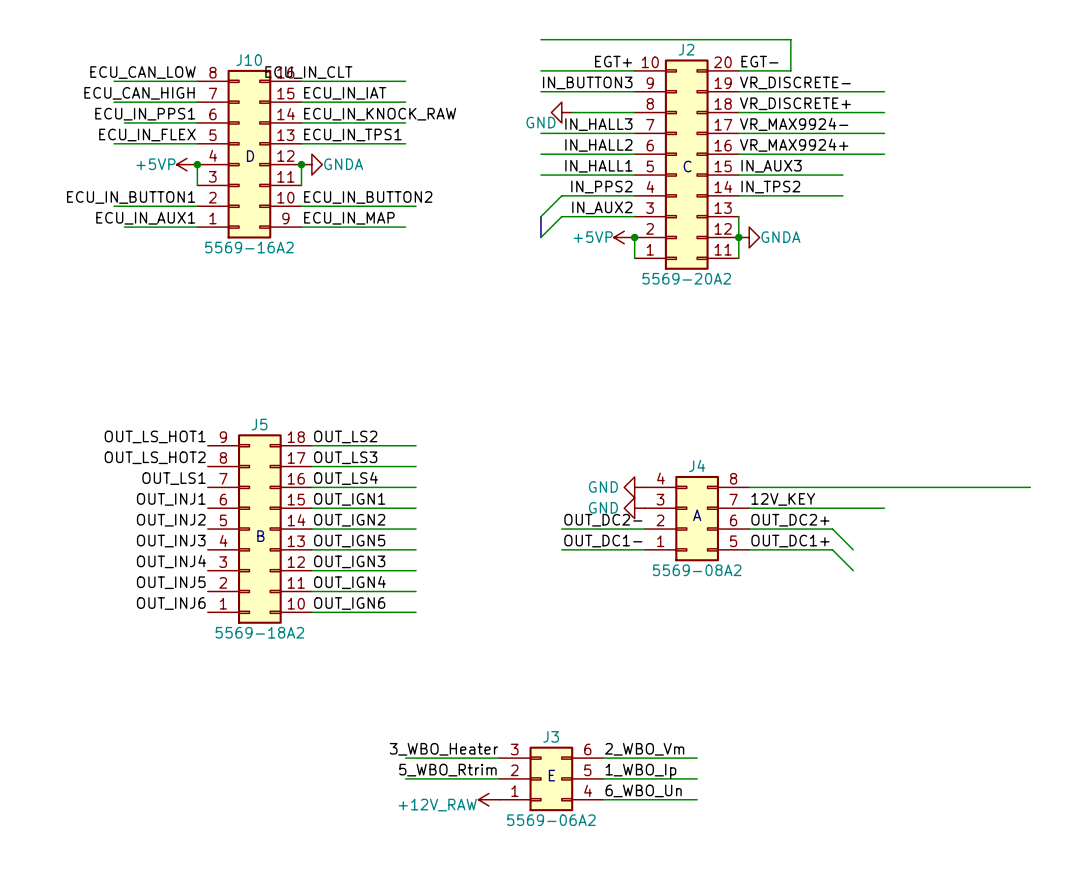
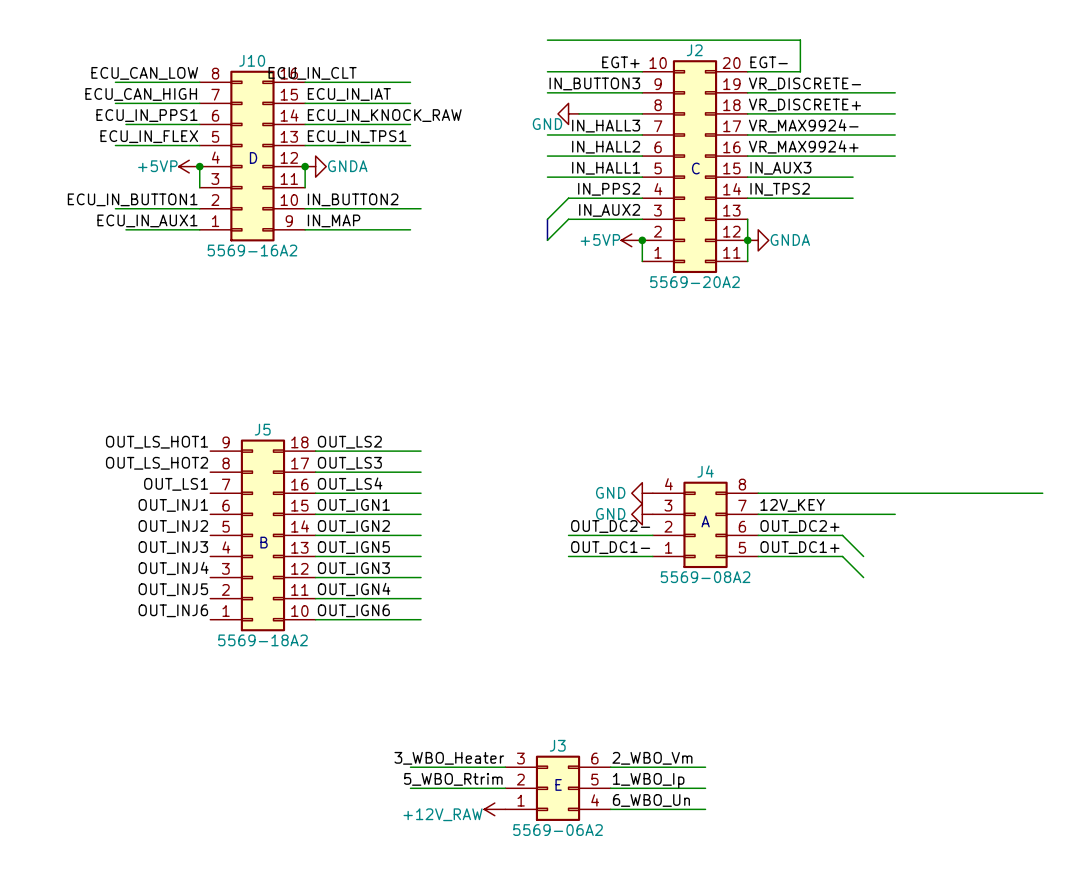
label: ECU_IN_BUTTON2 (368, 197) -> IN_BUTTON2 (353, 199)
label: ECU_IN_MAP (349, 218) -> IN_MAP (334, 220)

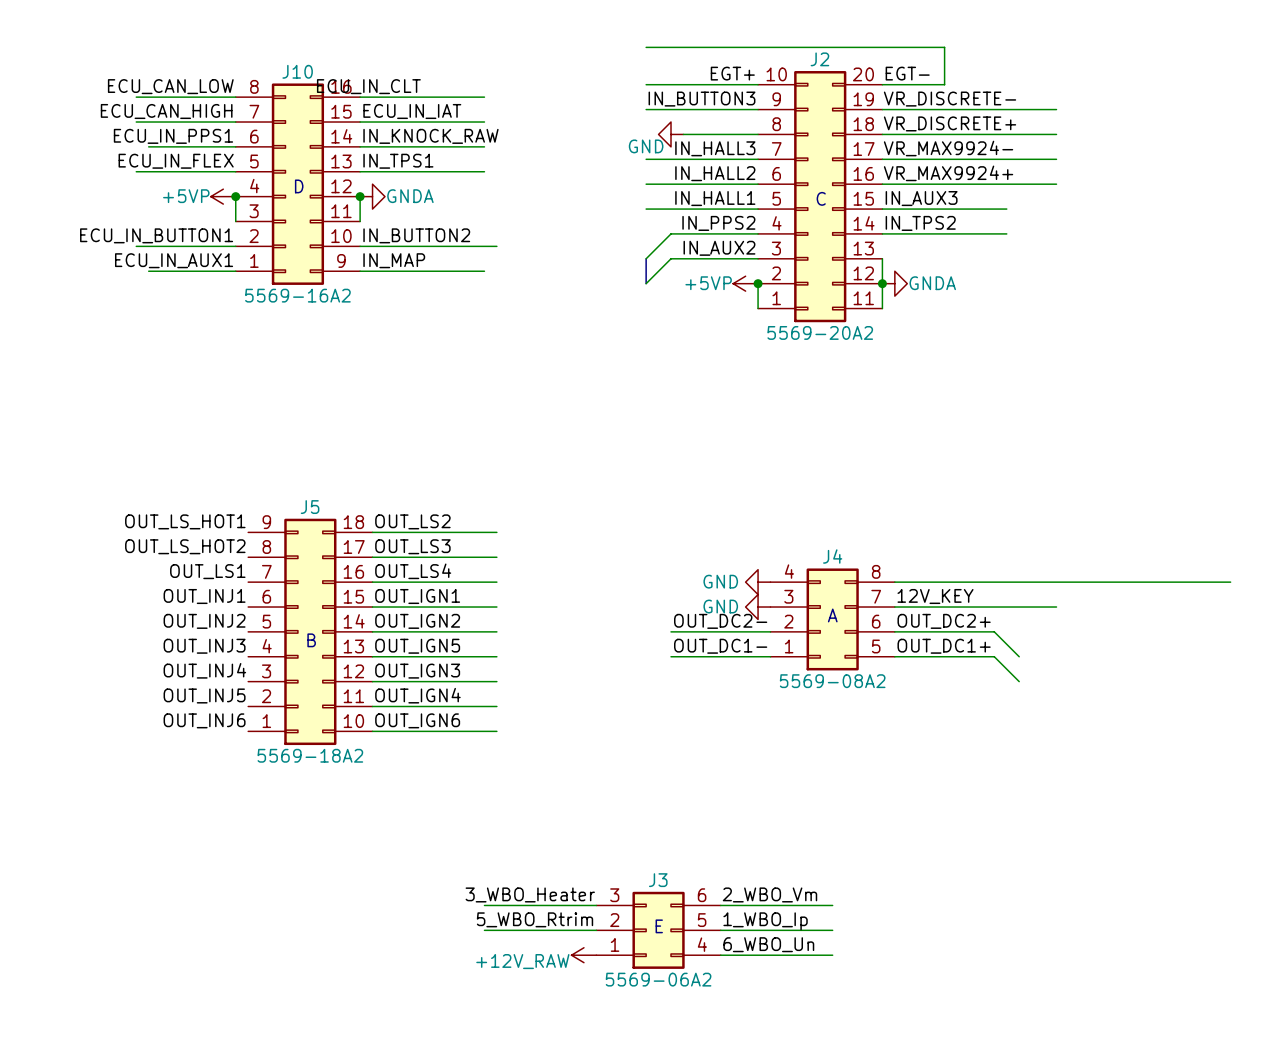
label: ECU_IN_KNOCK_RAW (384, 115) -> IN_KNOCK_RAW (430, 136)
label: ECU_IN_TPS1 (357, 136) -> IN_TPS1 (398, 161)

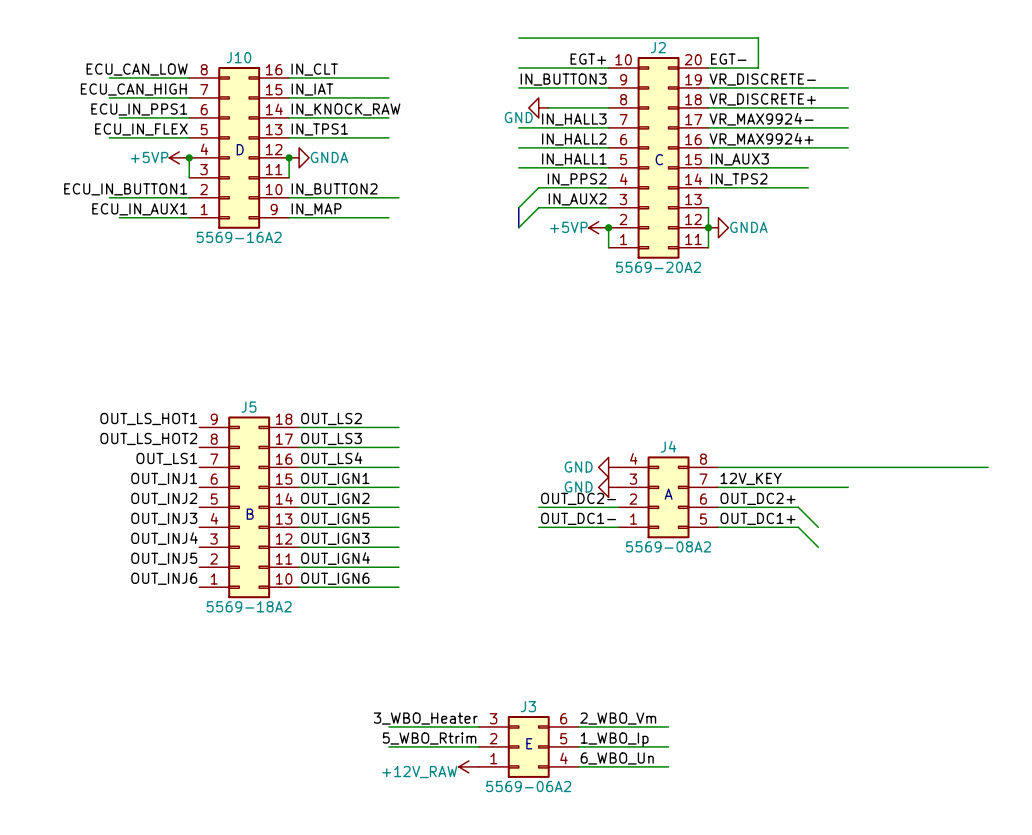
label: ECU_IN_CLT (368, 86) -> IN_CLT (314, 69)
label: ECU_IN_IAT (412, 111) -> IN_IAT (312, 89)

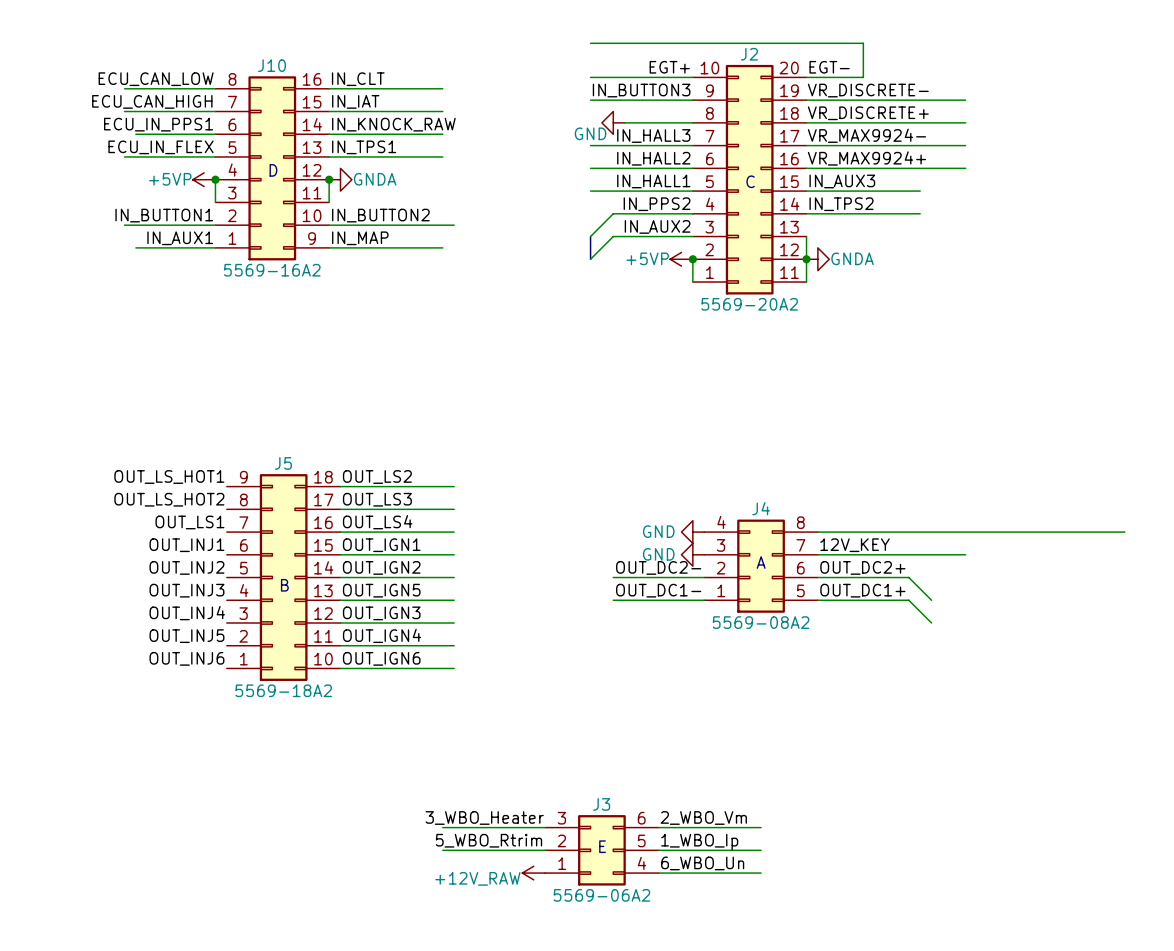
label: ECU_IN_BUTTON1 (125, 189) -> IN_BUTTON1 (164, 215)
label: ECU_IN_AUX1 (139, 209) -> IN_AUX1 (180, 238)

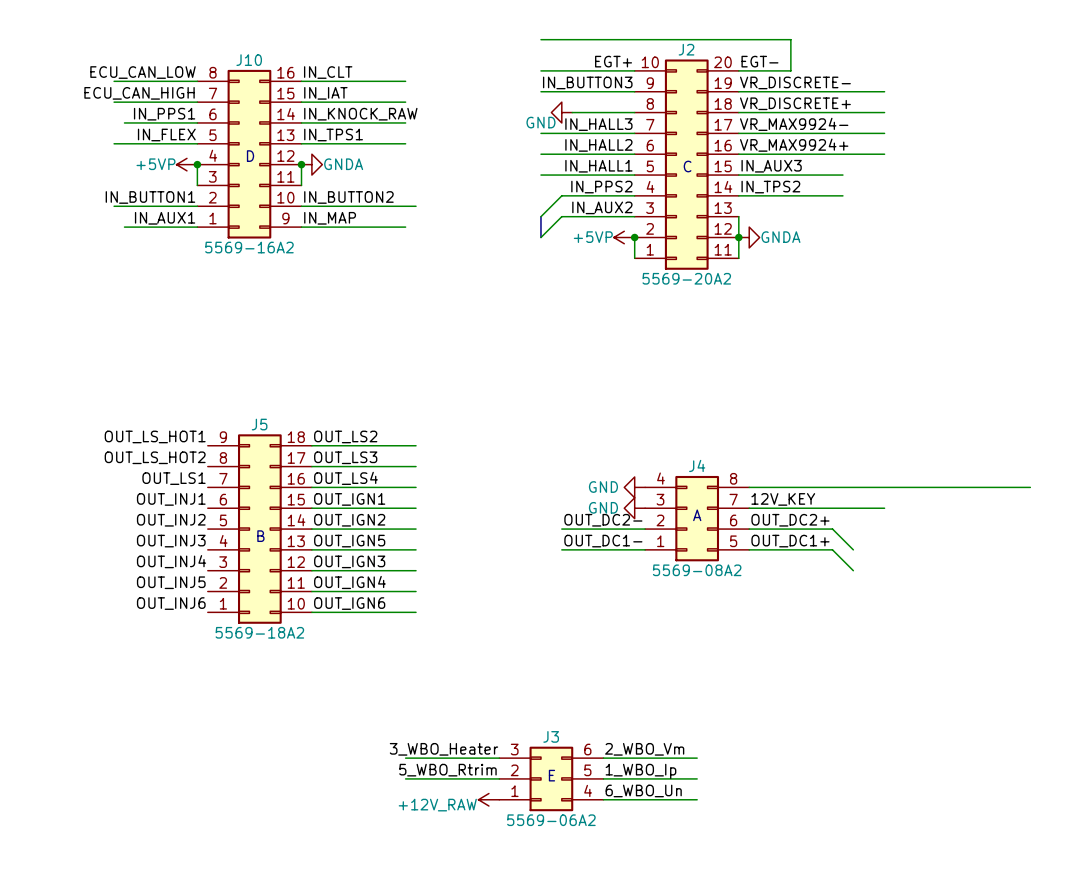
label: ECU_IN_PPS1 (158, 124) -> IN_PPS1 (164, 114)
label: ECU_IN_FLEX (160, 147) -> IN_FLEX (166, 135)

